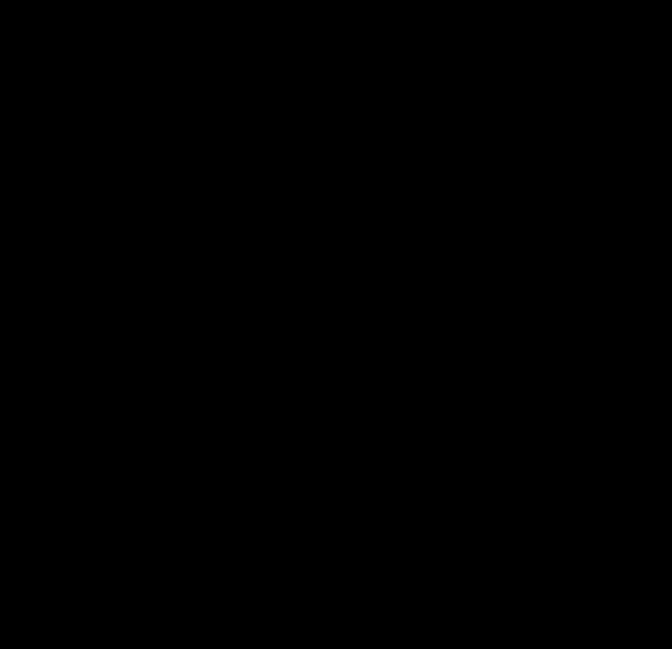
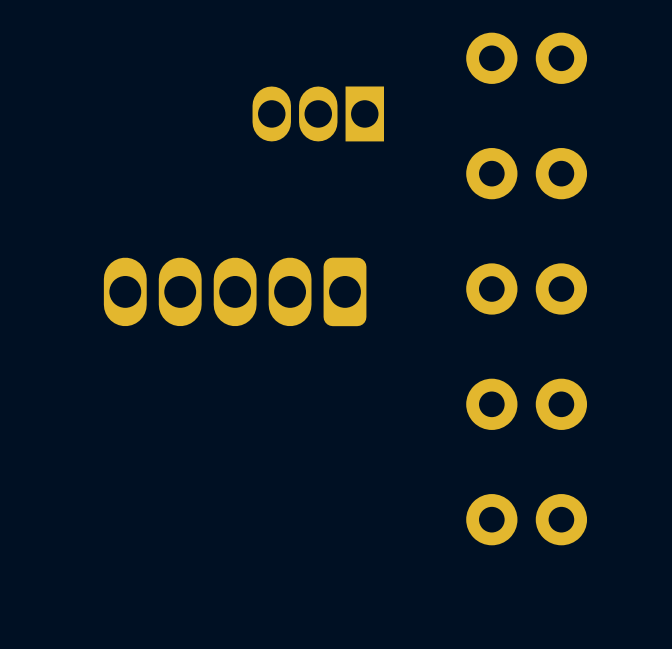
part: none -> (526, 58)
part: none -> (318, 113)
part: none -> (526, 173)
part: none -> (526, 288)
part: none -> (235, 291)
part: none -> (526, 404)
part: none -> (526, 519)

